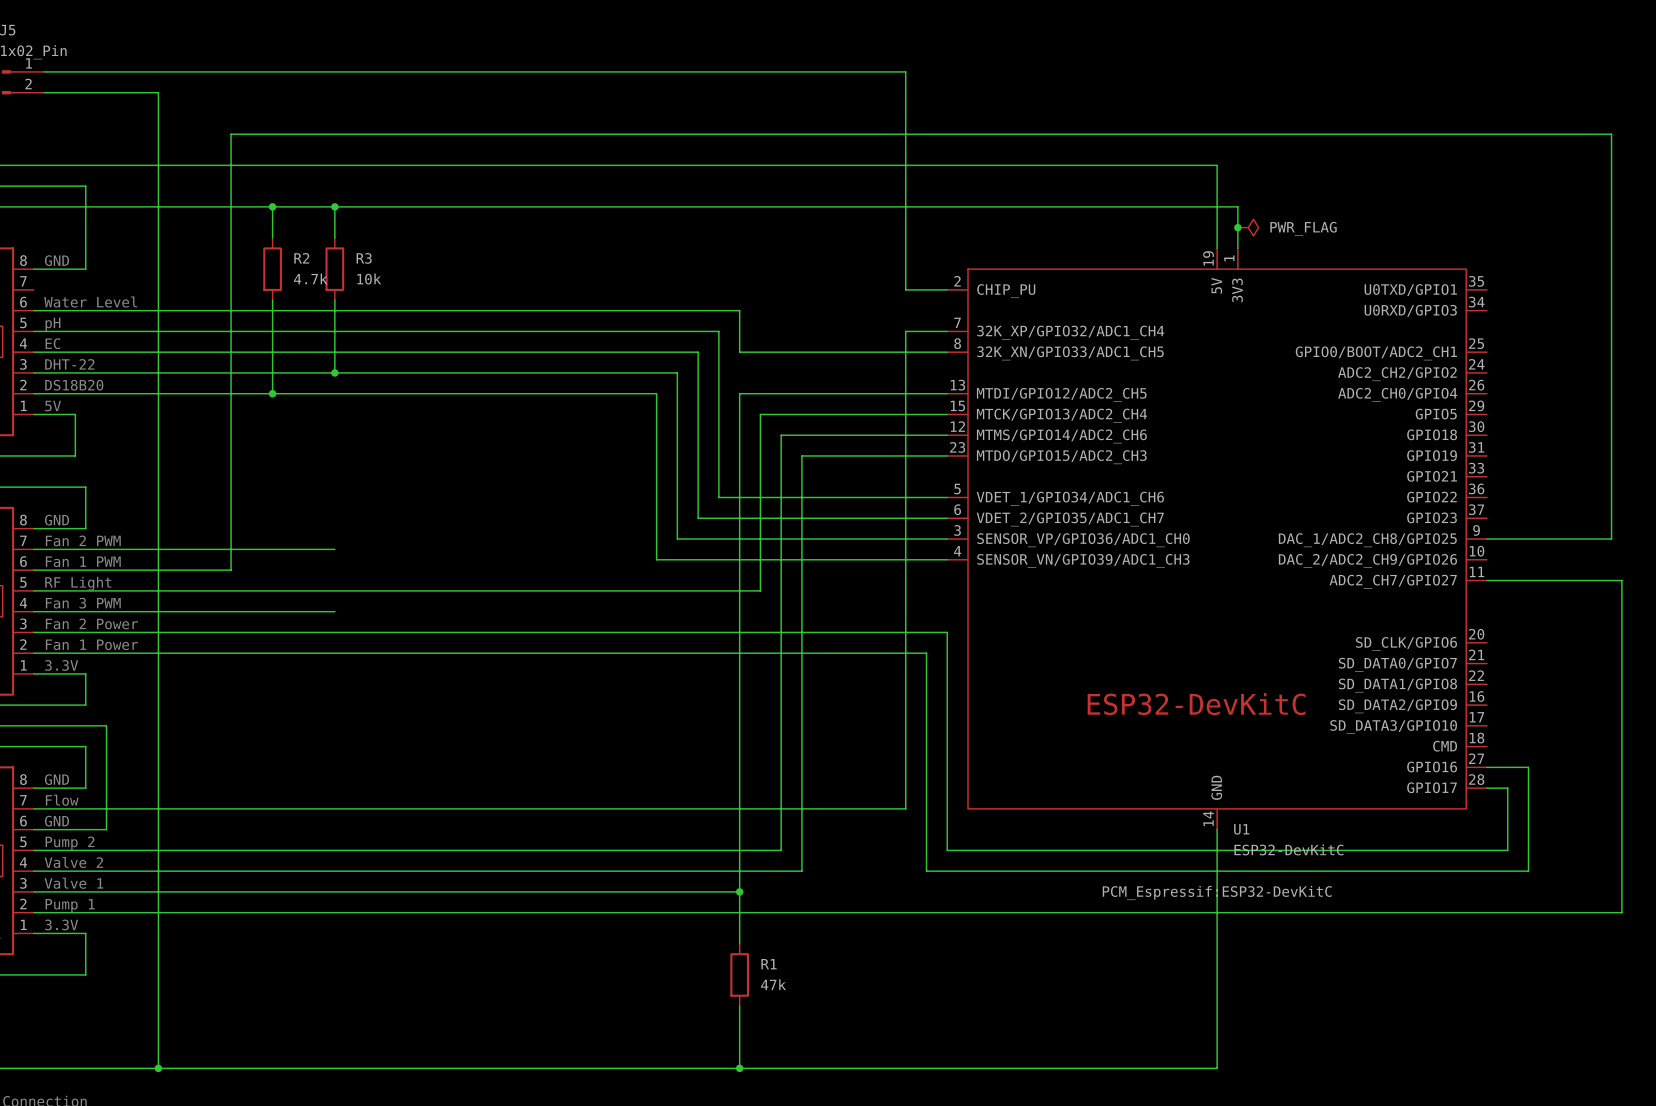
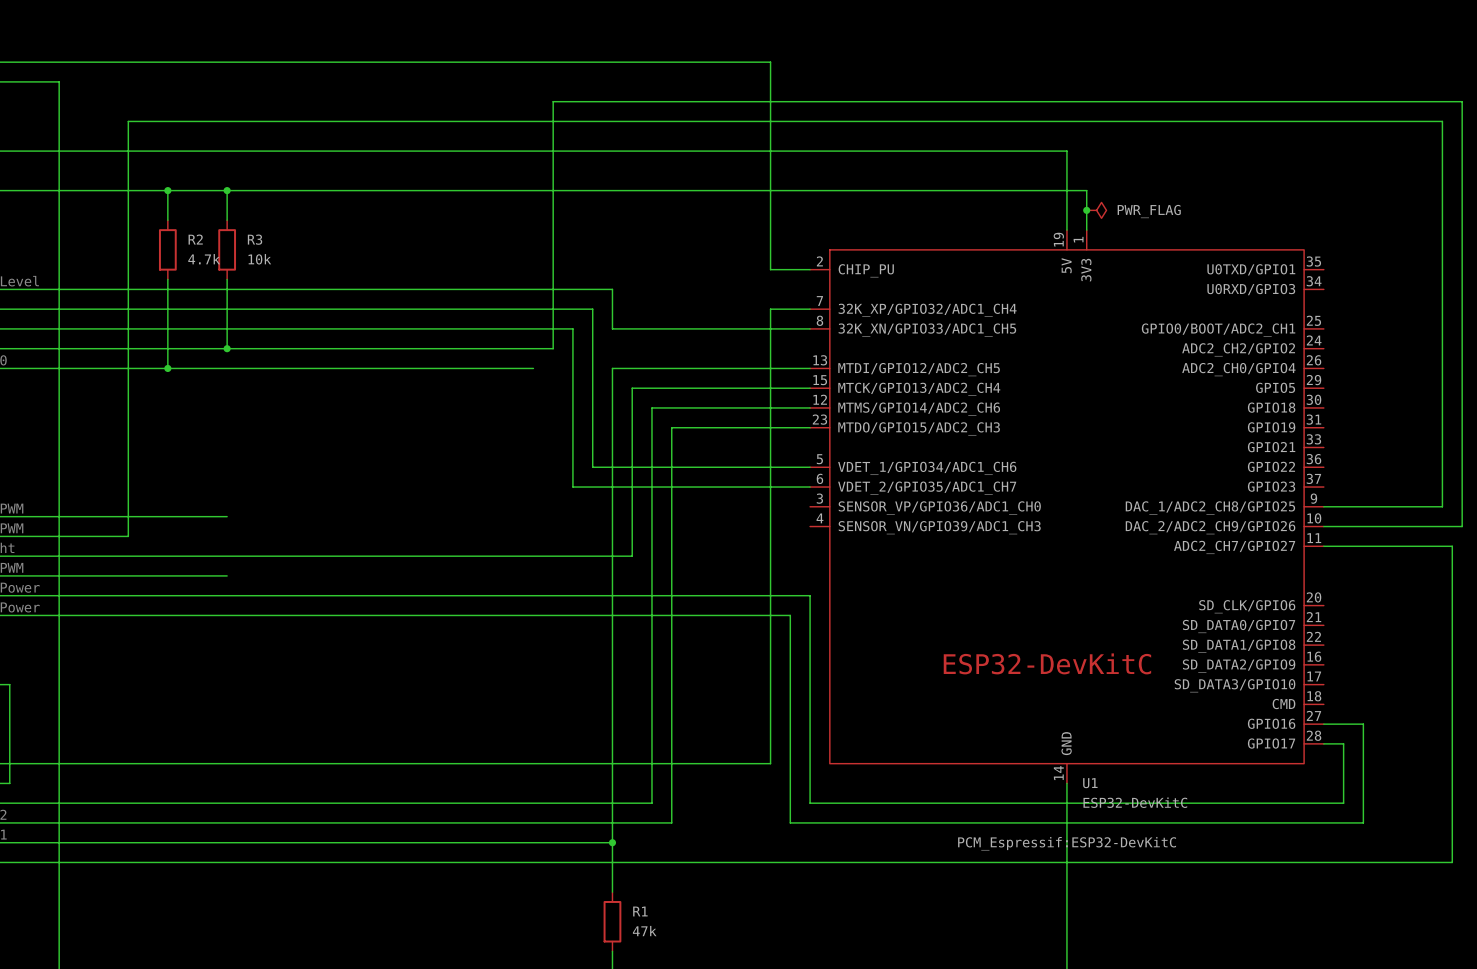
wire: (677, 372) (677, 539) (947, 539) -> (553, 348) (553, 101) (1462, 101) (1462, 526) (1323, 526)
wire: (656, 393) (656, 559) (947, 559) -> none

